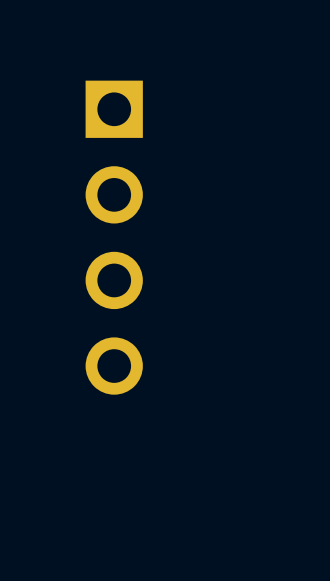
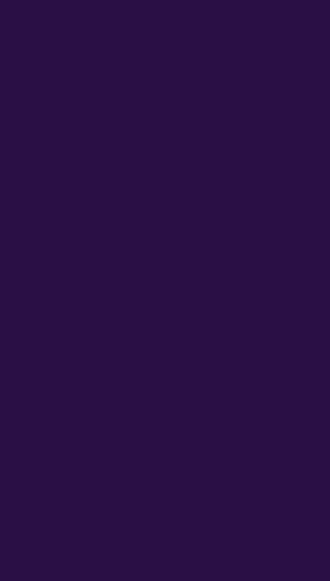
part: (114, 237) -> none

